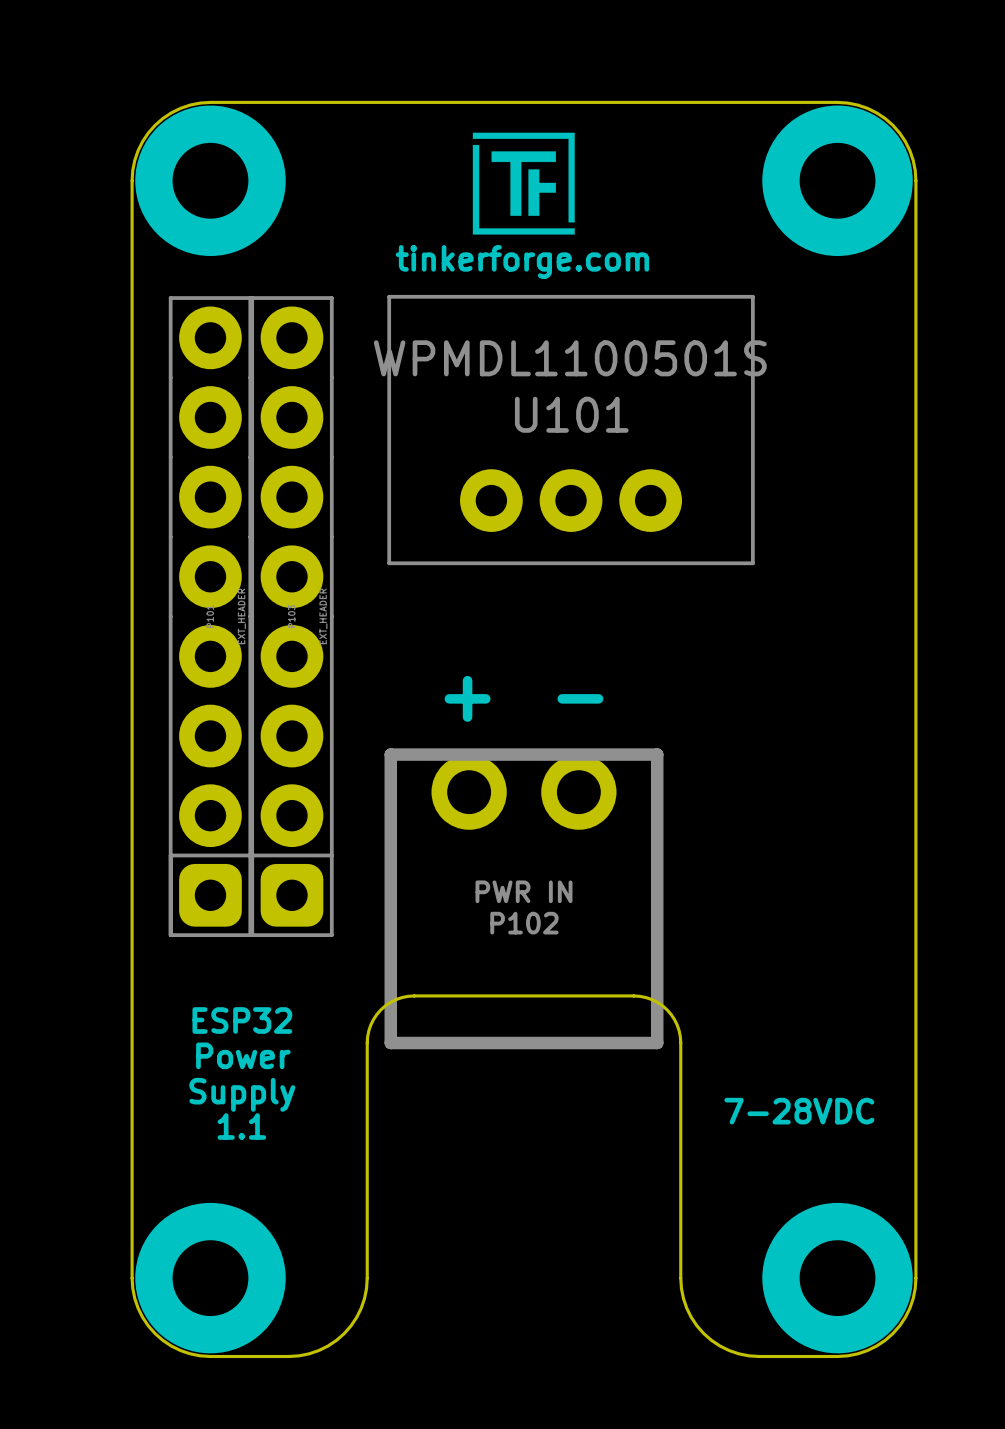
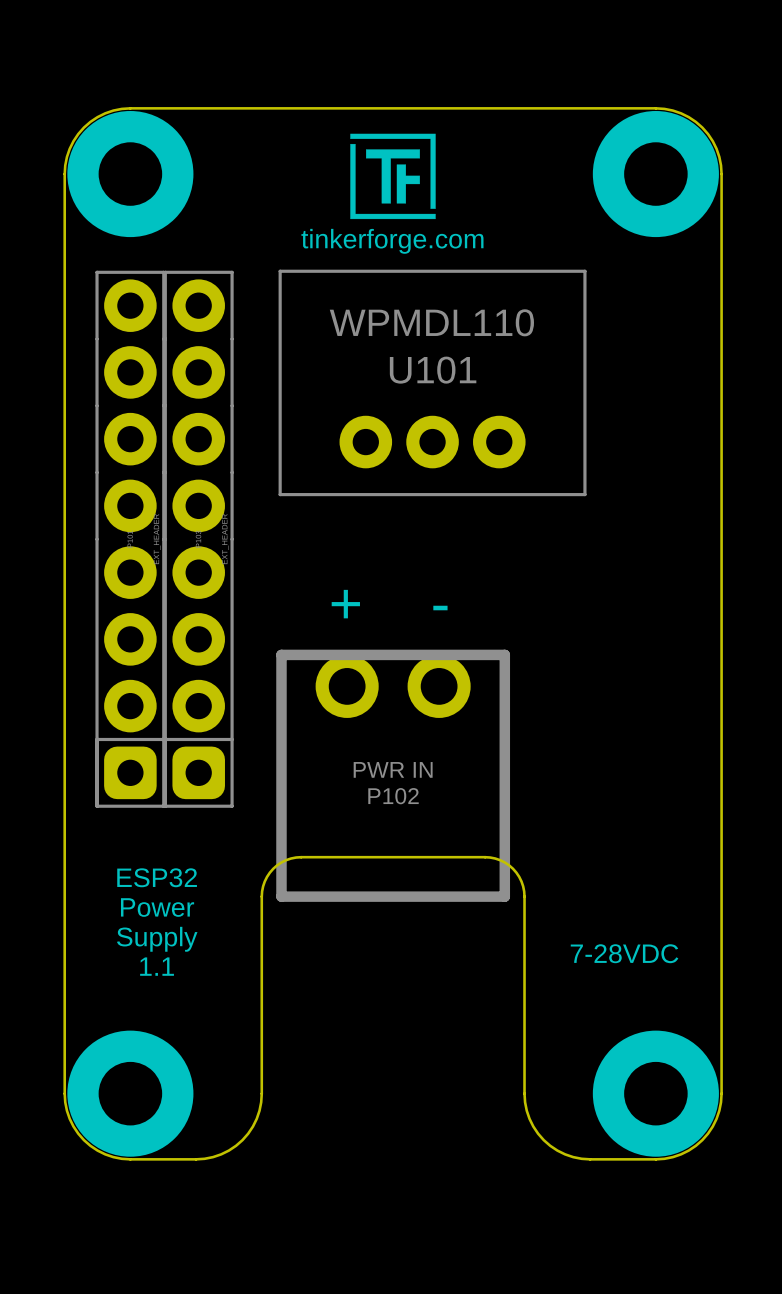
U101 value: WPMDL1100501S (570, 358) -> WPMDL110 (431, 322)

